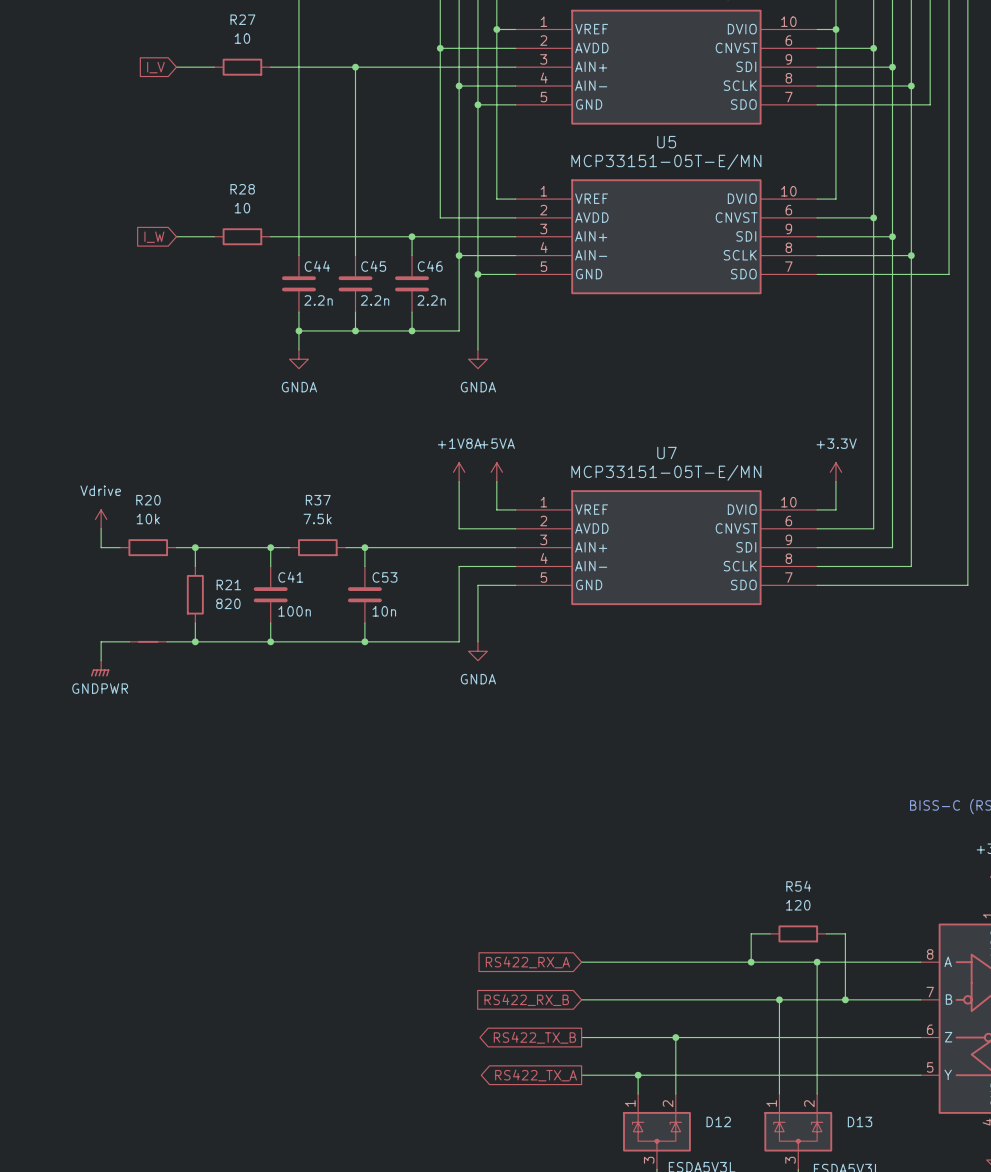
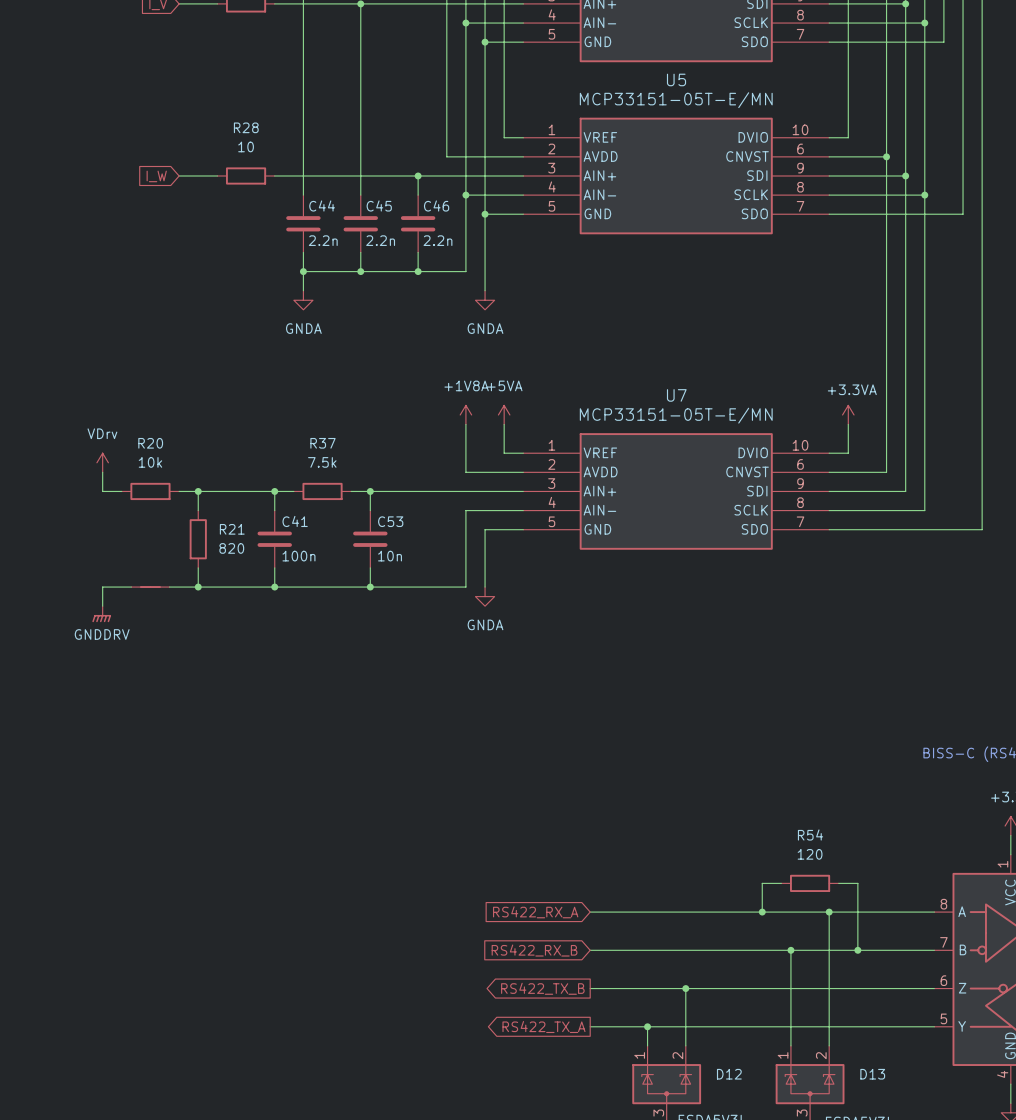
power symbol: +3.3V (835, 472) -> +3.3VA (848, 414)
power symbol: Vdrive (101, 519) -> VDrv (102, 462)
power symbol: GNDPWR (100, 668) -> GNDDRV (101, 614)

